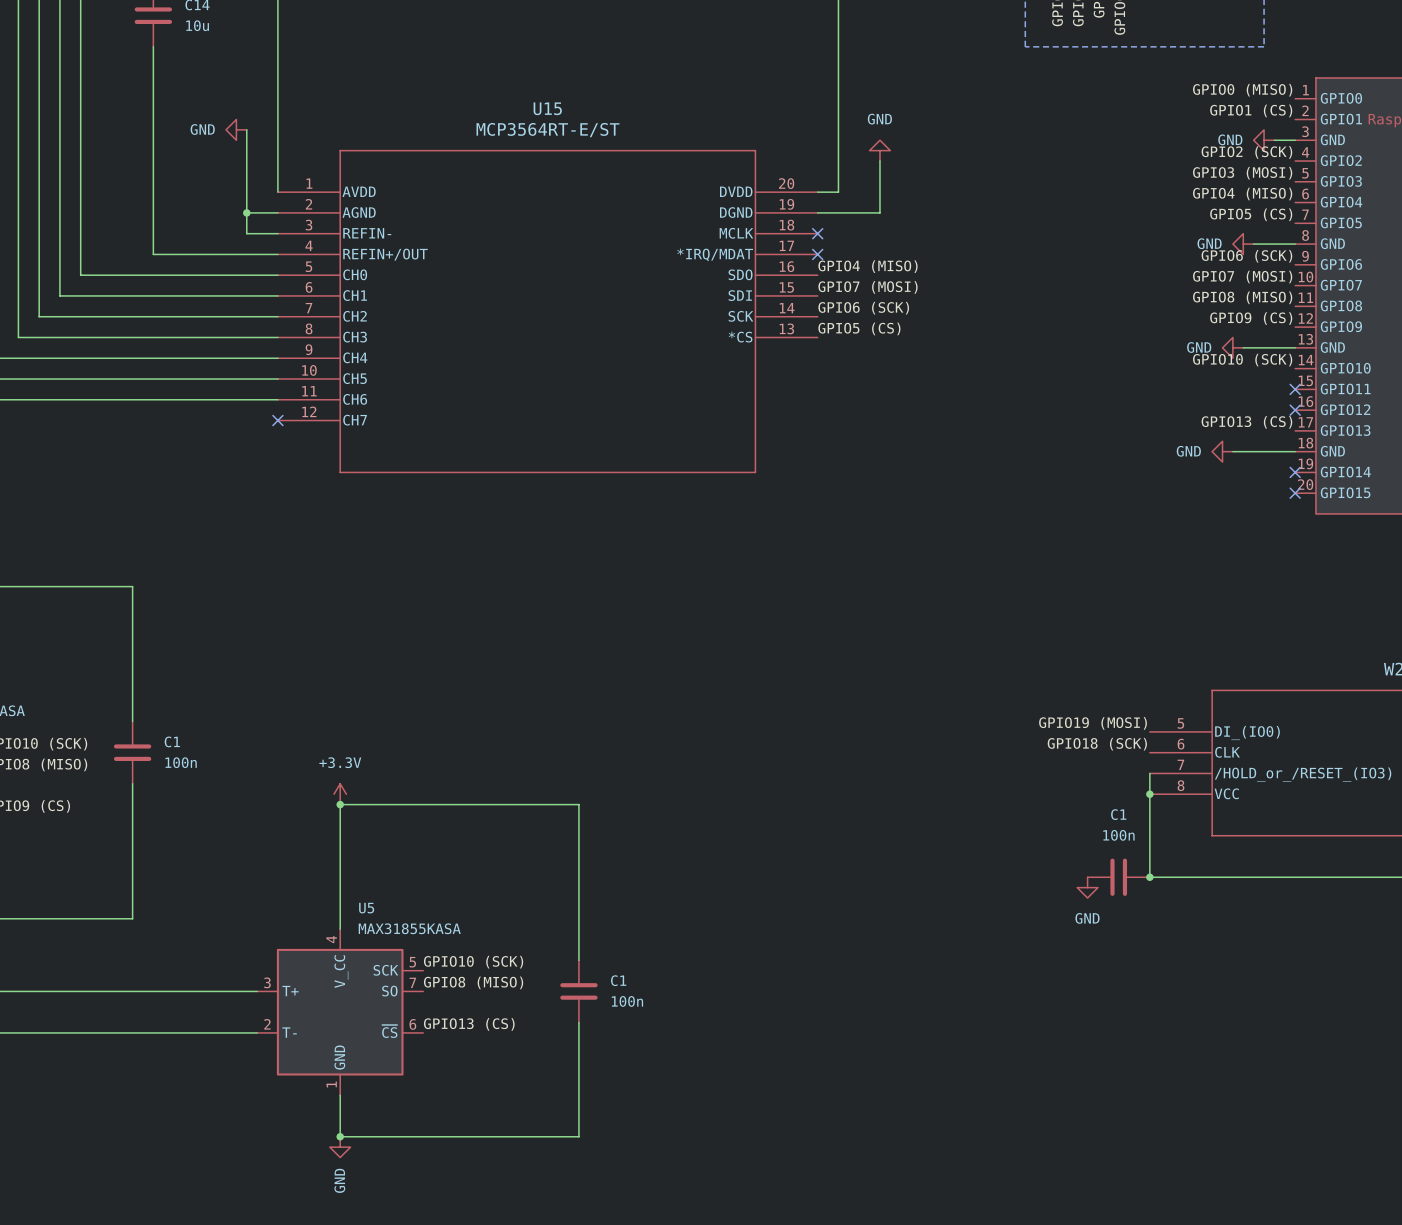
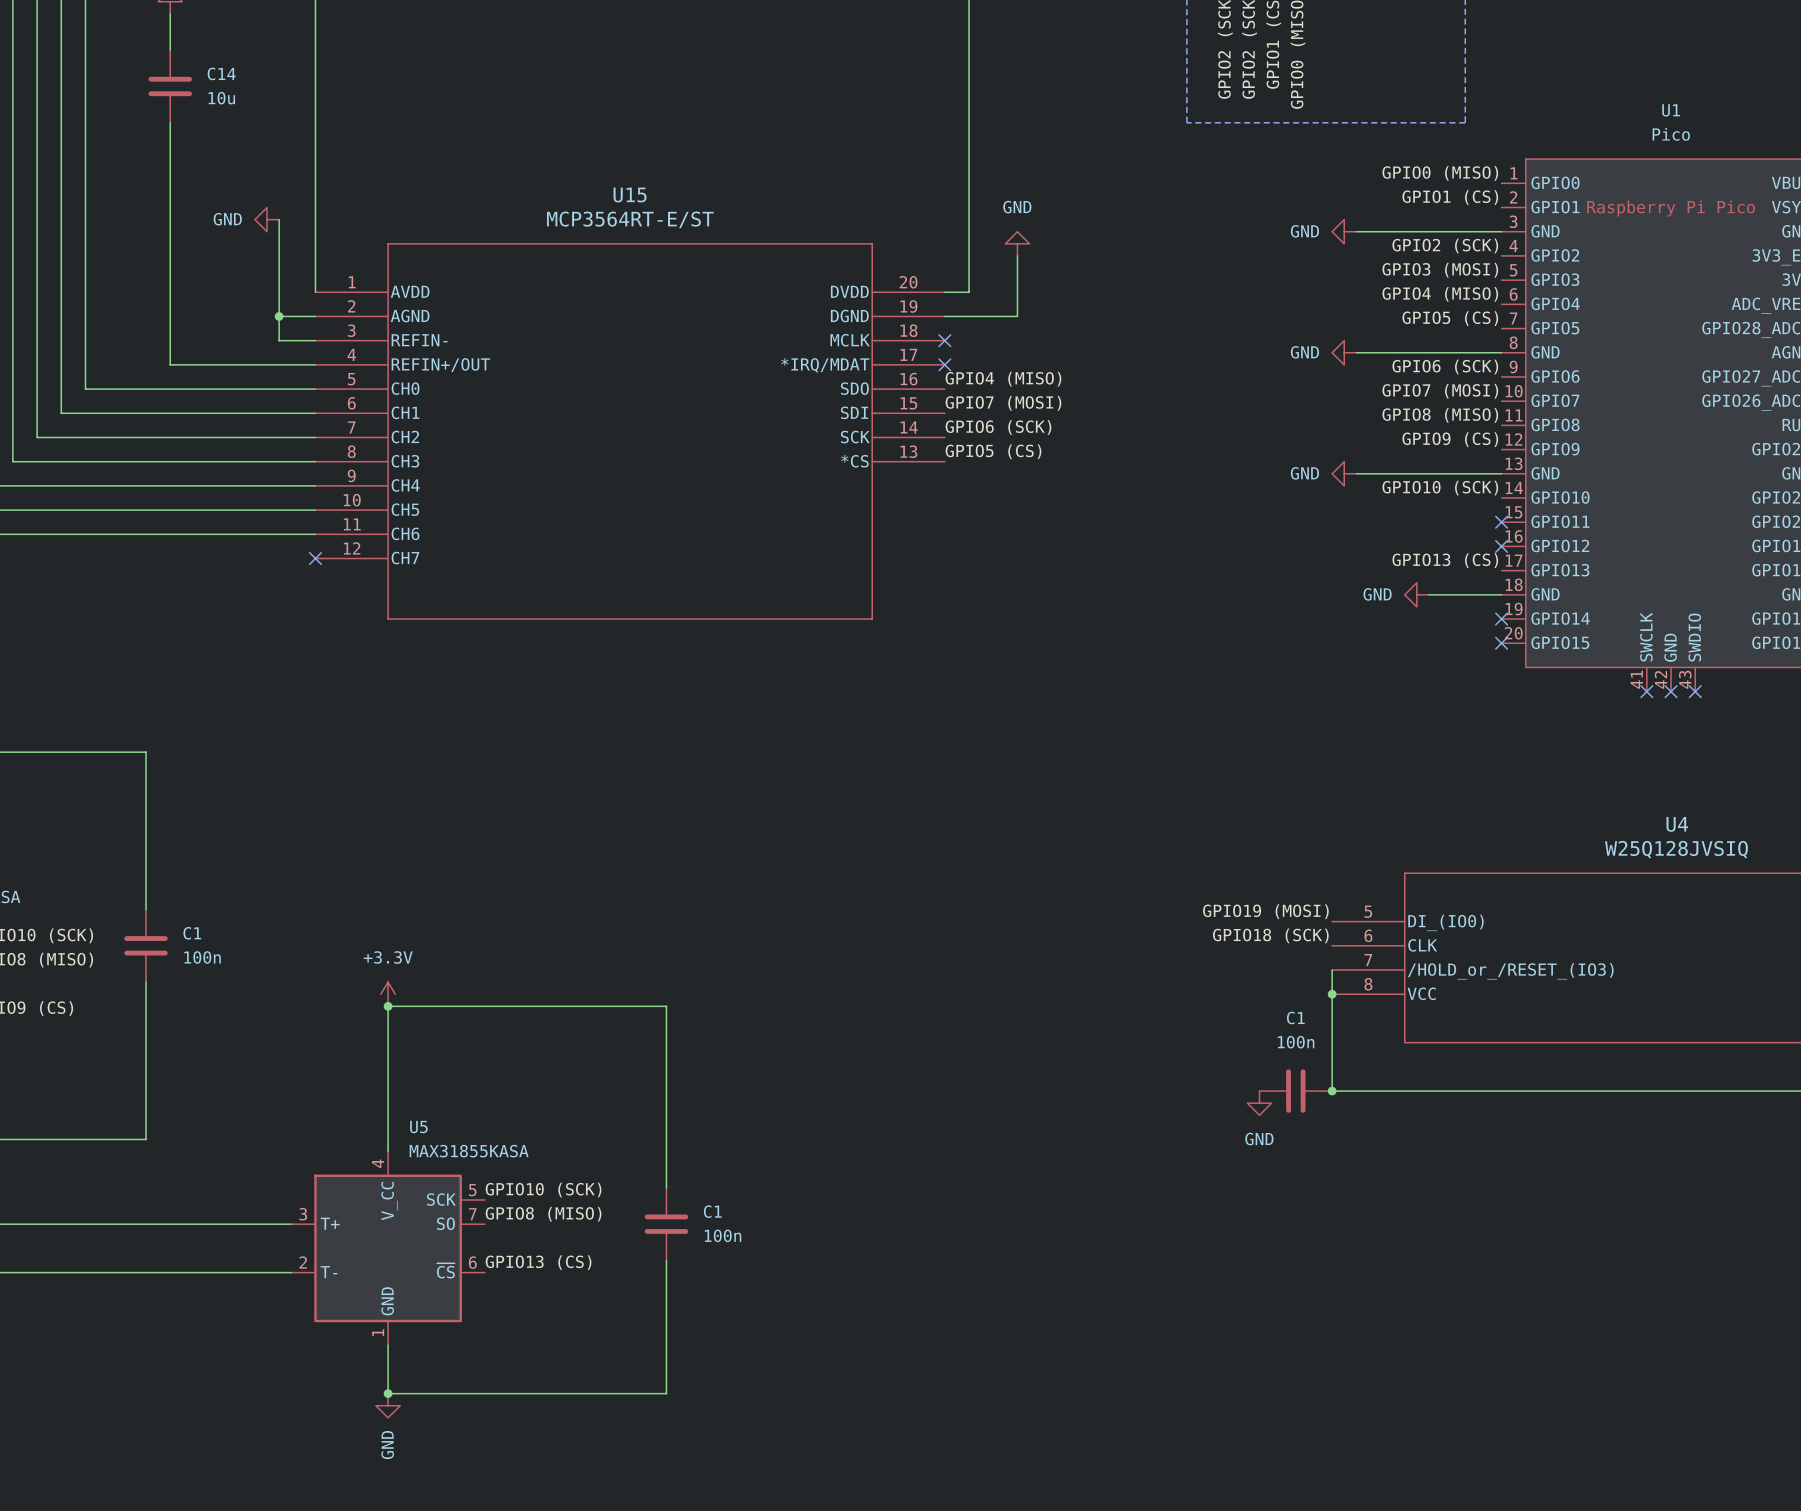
power symbol: none -> GND (1344, 231)
wire: none -> (1356, 231) (1477, 231)
power symbol: GND (1264, 140) -> none
power symbol: none -> GND (1344, 352)
wire: none -> (1356, 352) (1453, 352)
power symbol: GND (1243, 244) -> none
power symbol: none -> GND (1344, 473)
wire: none -> (1356, 473) (1441, 473)
power symbol: GND (1232, 347) -> none

